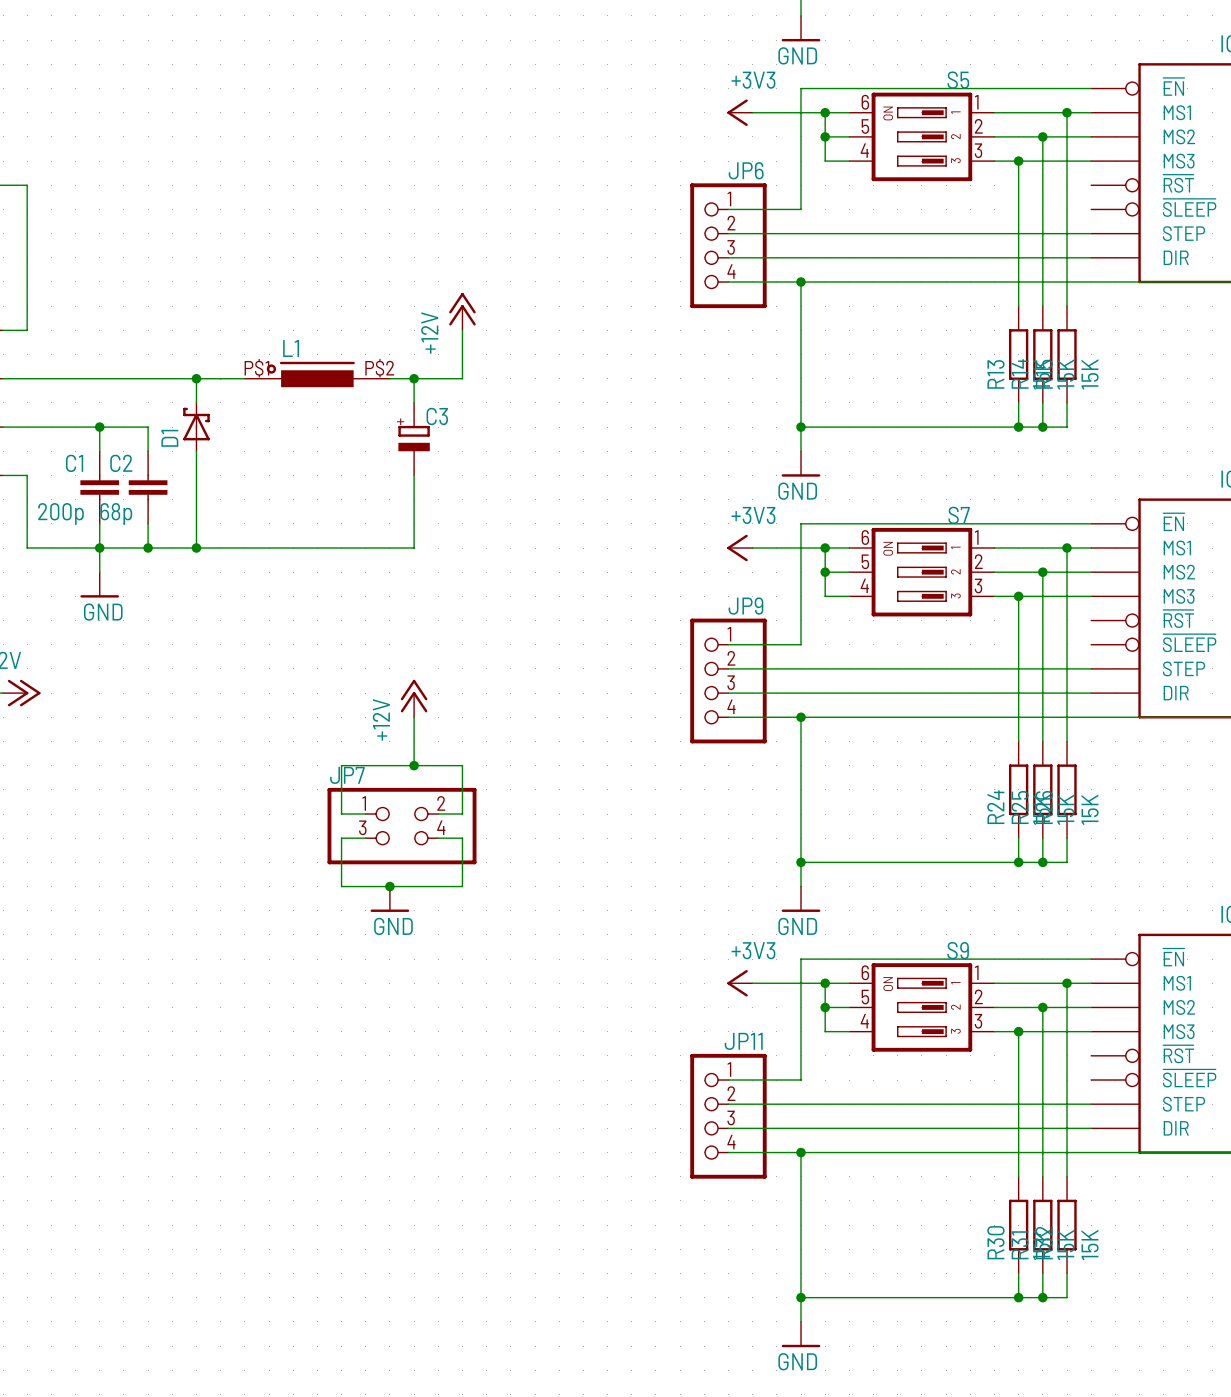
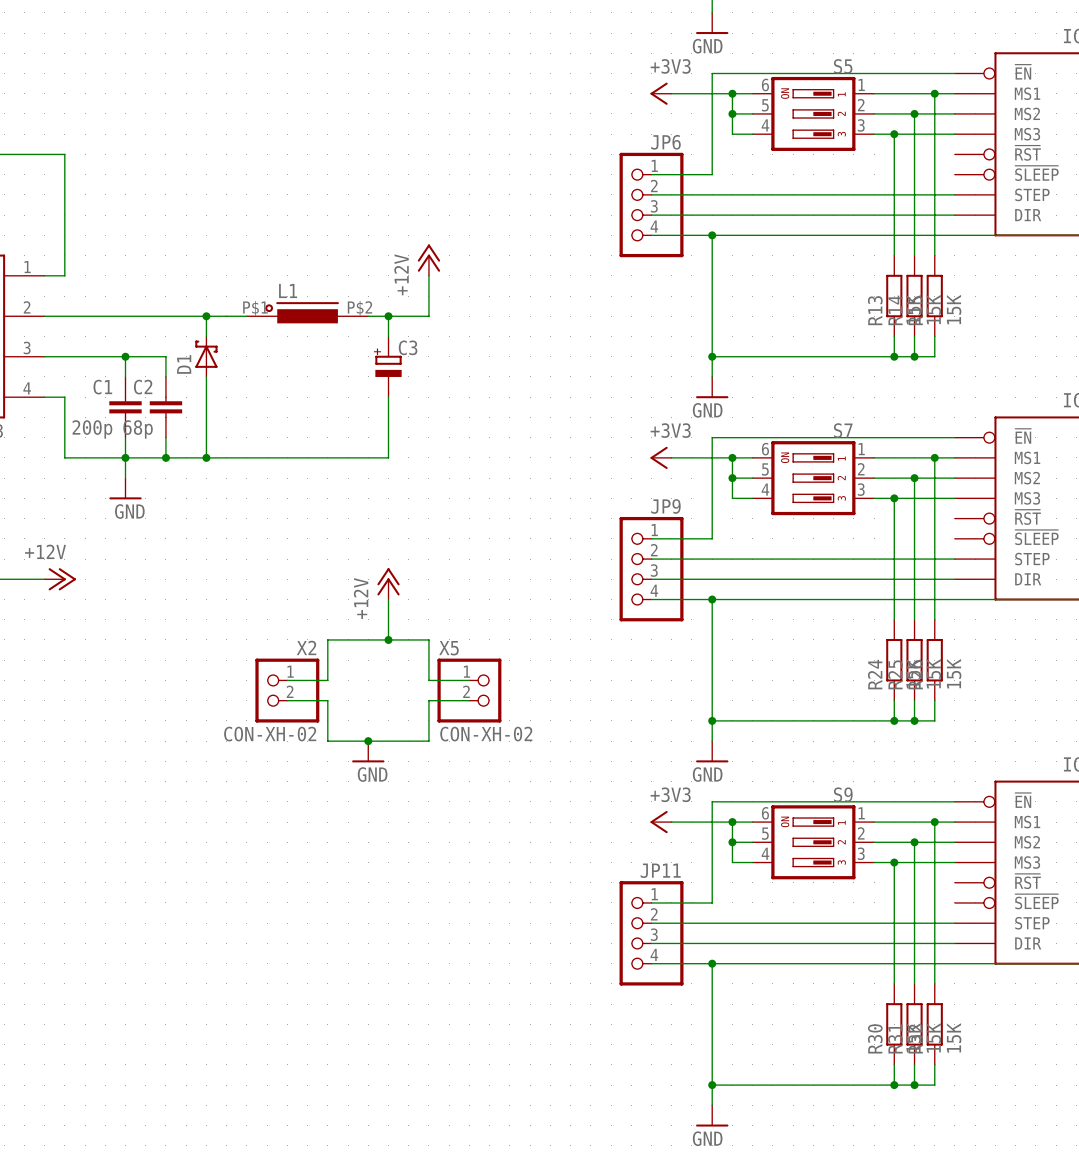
wire: (341, 814) (365, 814) -> (327, 680) (287, 680)
wire: (438, 814) (462, 814) -> (469, 680) (428, 680)
X2: none -> CON-XH-02 (287, 690)
JP7: (402, 826) -> none
X5: none -> CON-XH-02 (469, 690)
wire: (341, 838) (365, 838) -> (327, 700) (287, 700)
wire: (438, 838) (462, 838) -> (469, 700) (428, 700)

